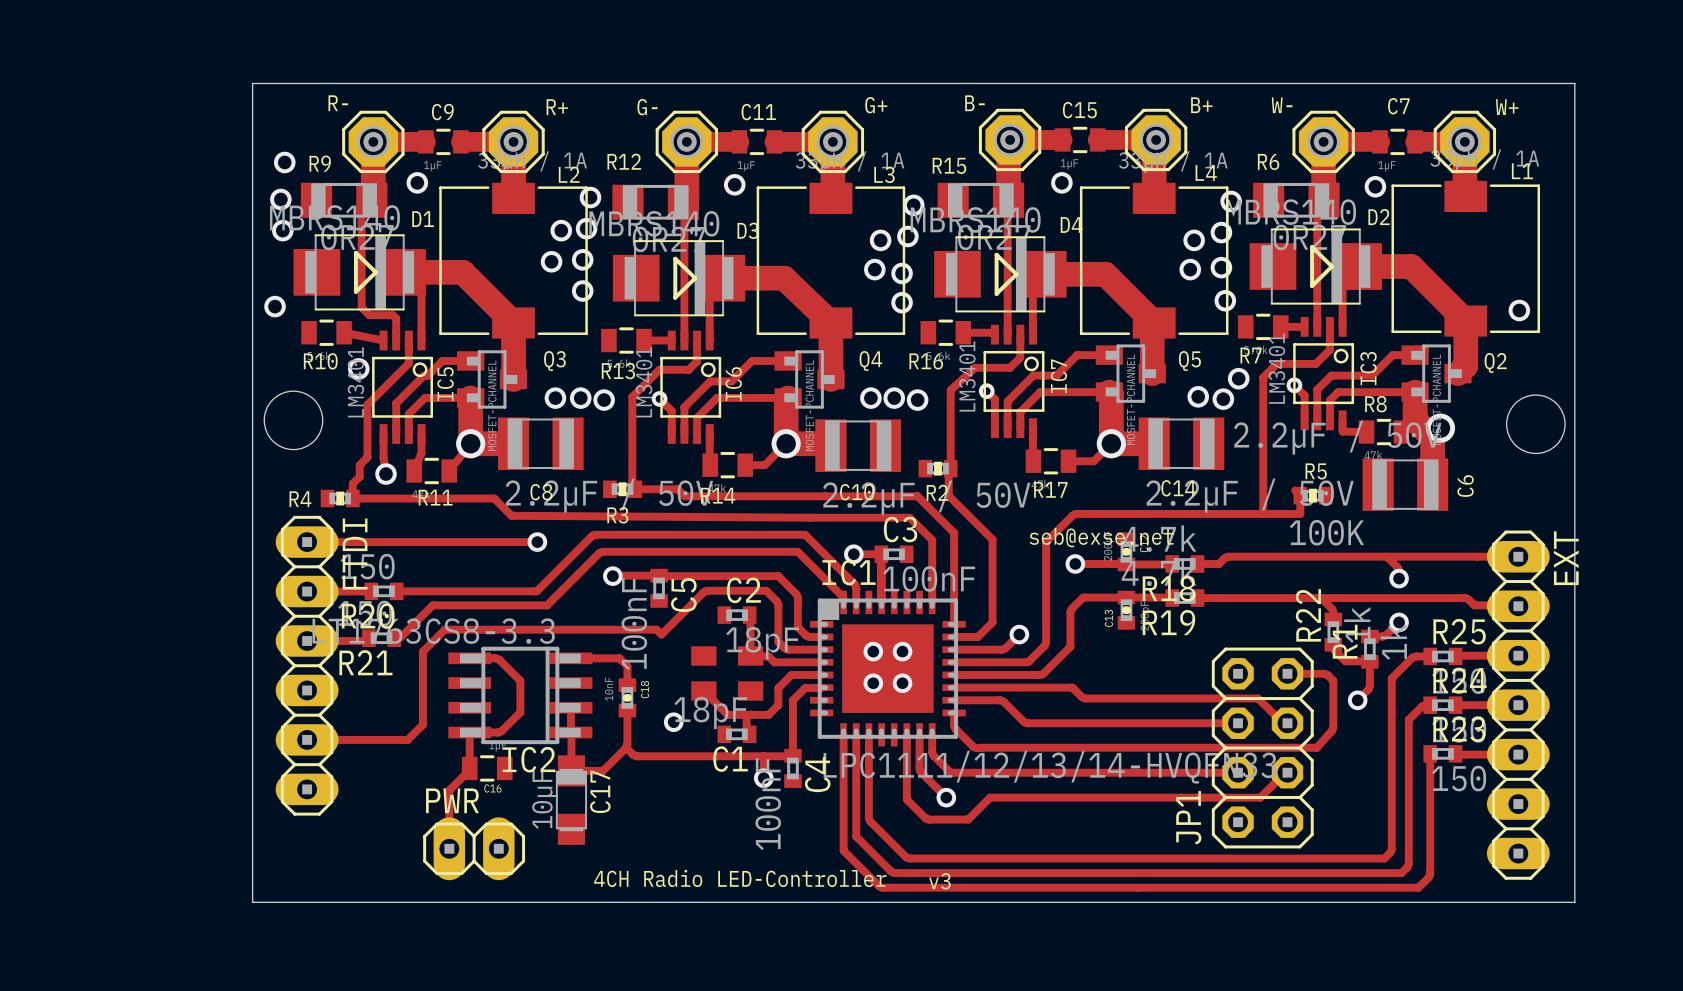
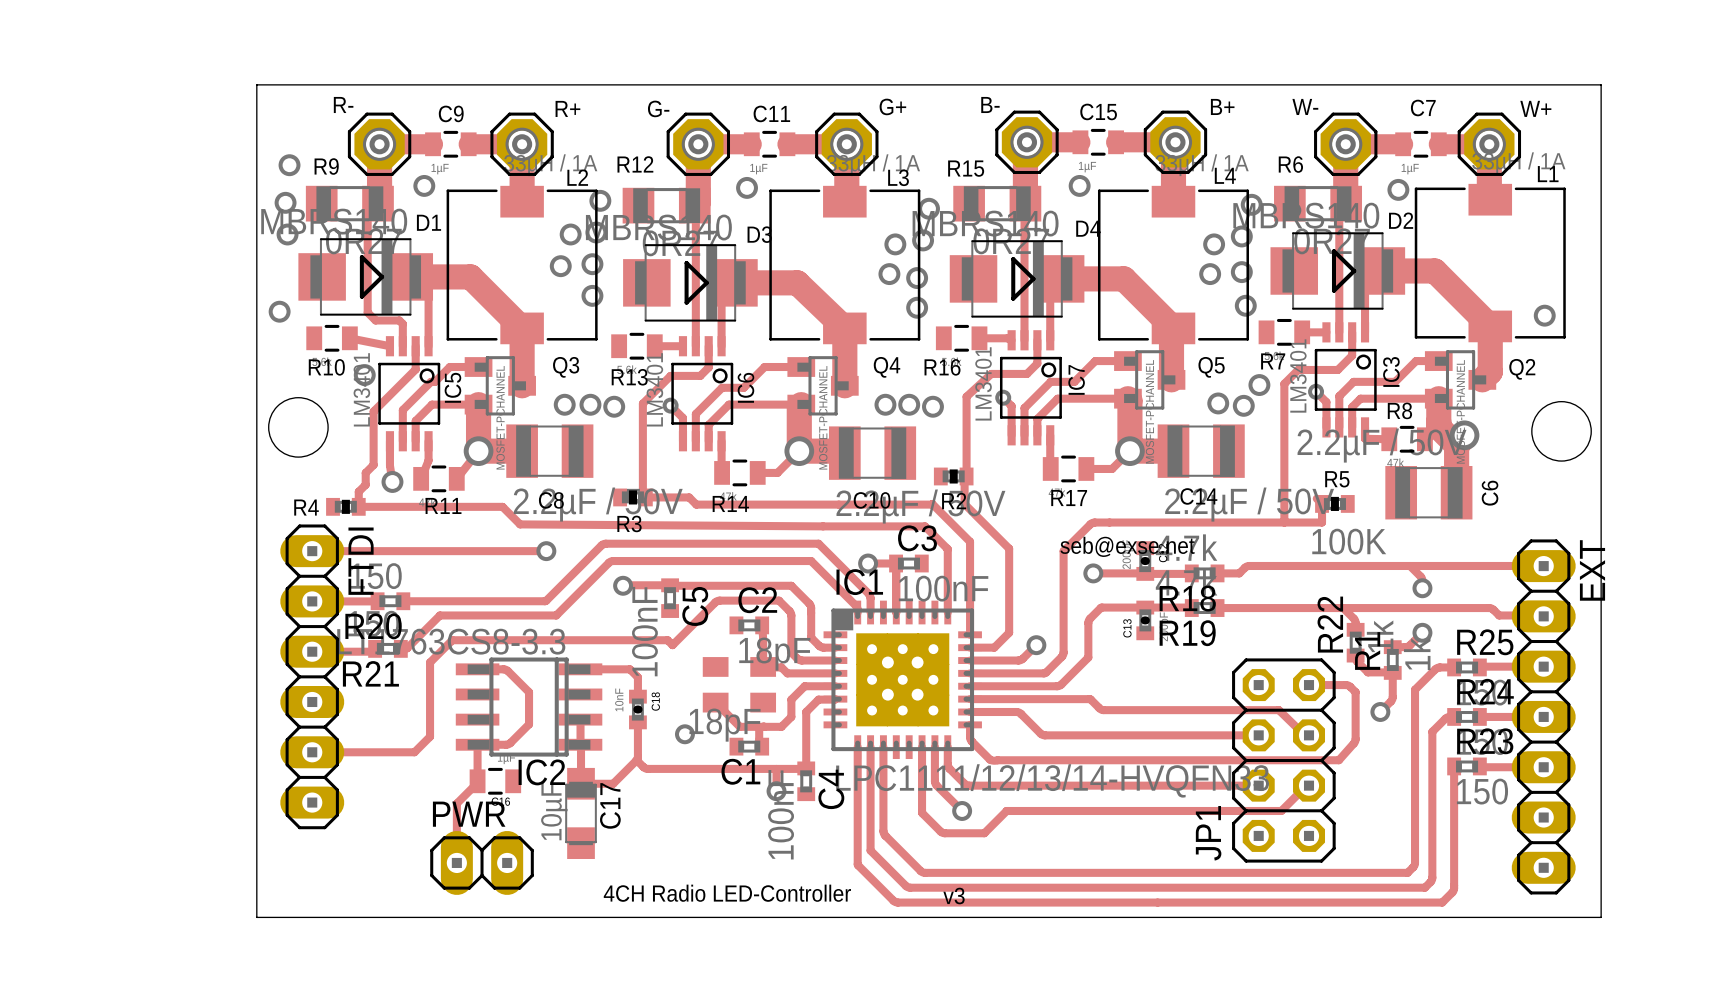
IC1 footprint: [810, 590, 966, 747] -> [823, 600, 982, 760]

